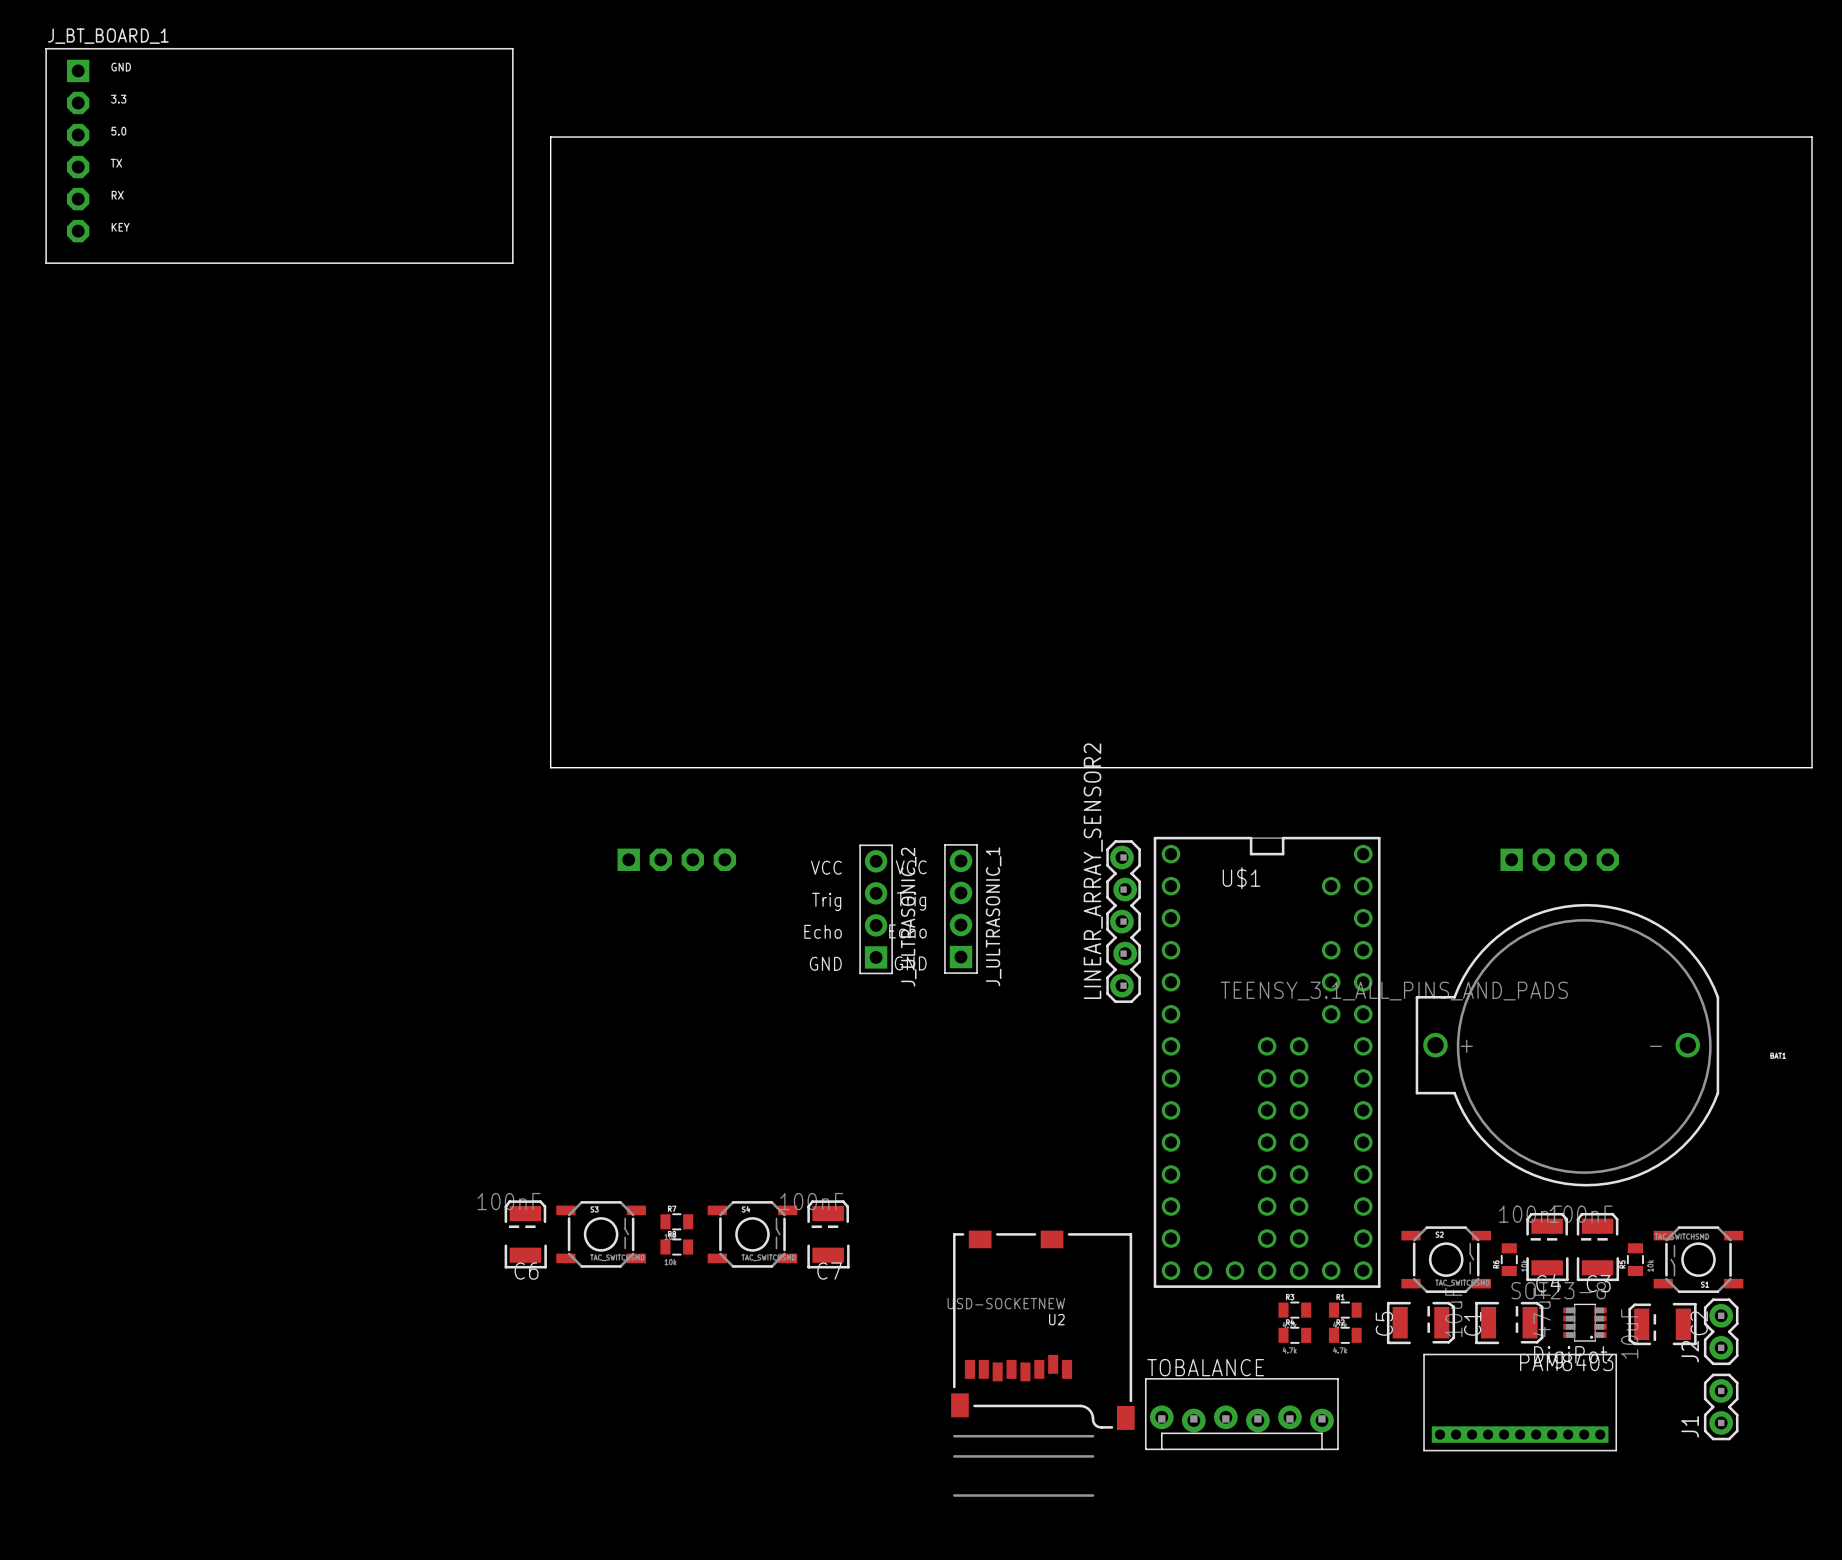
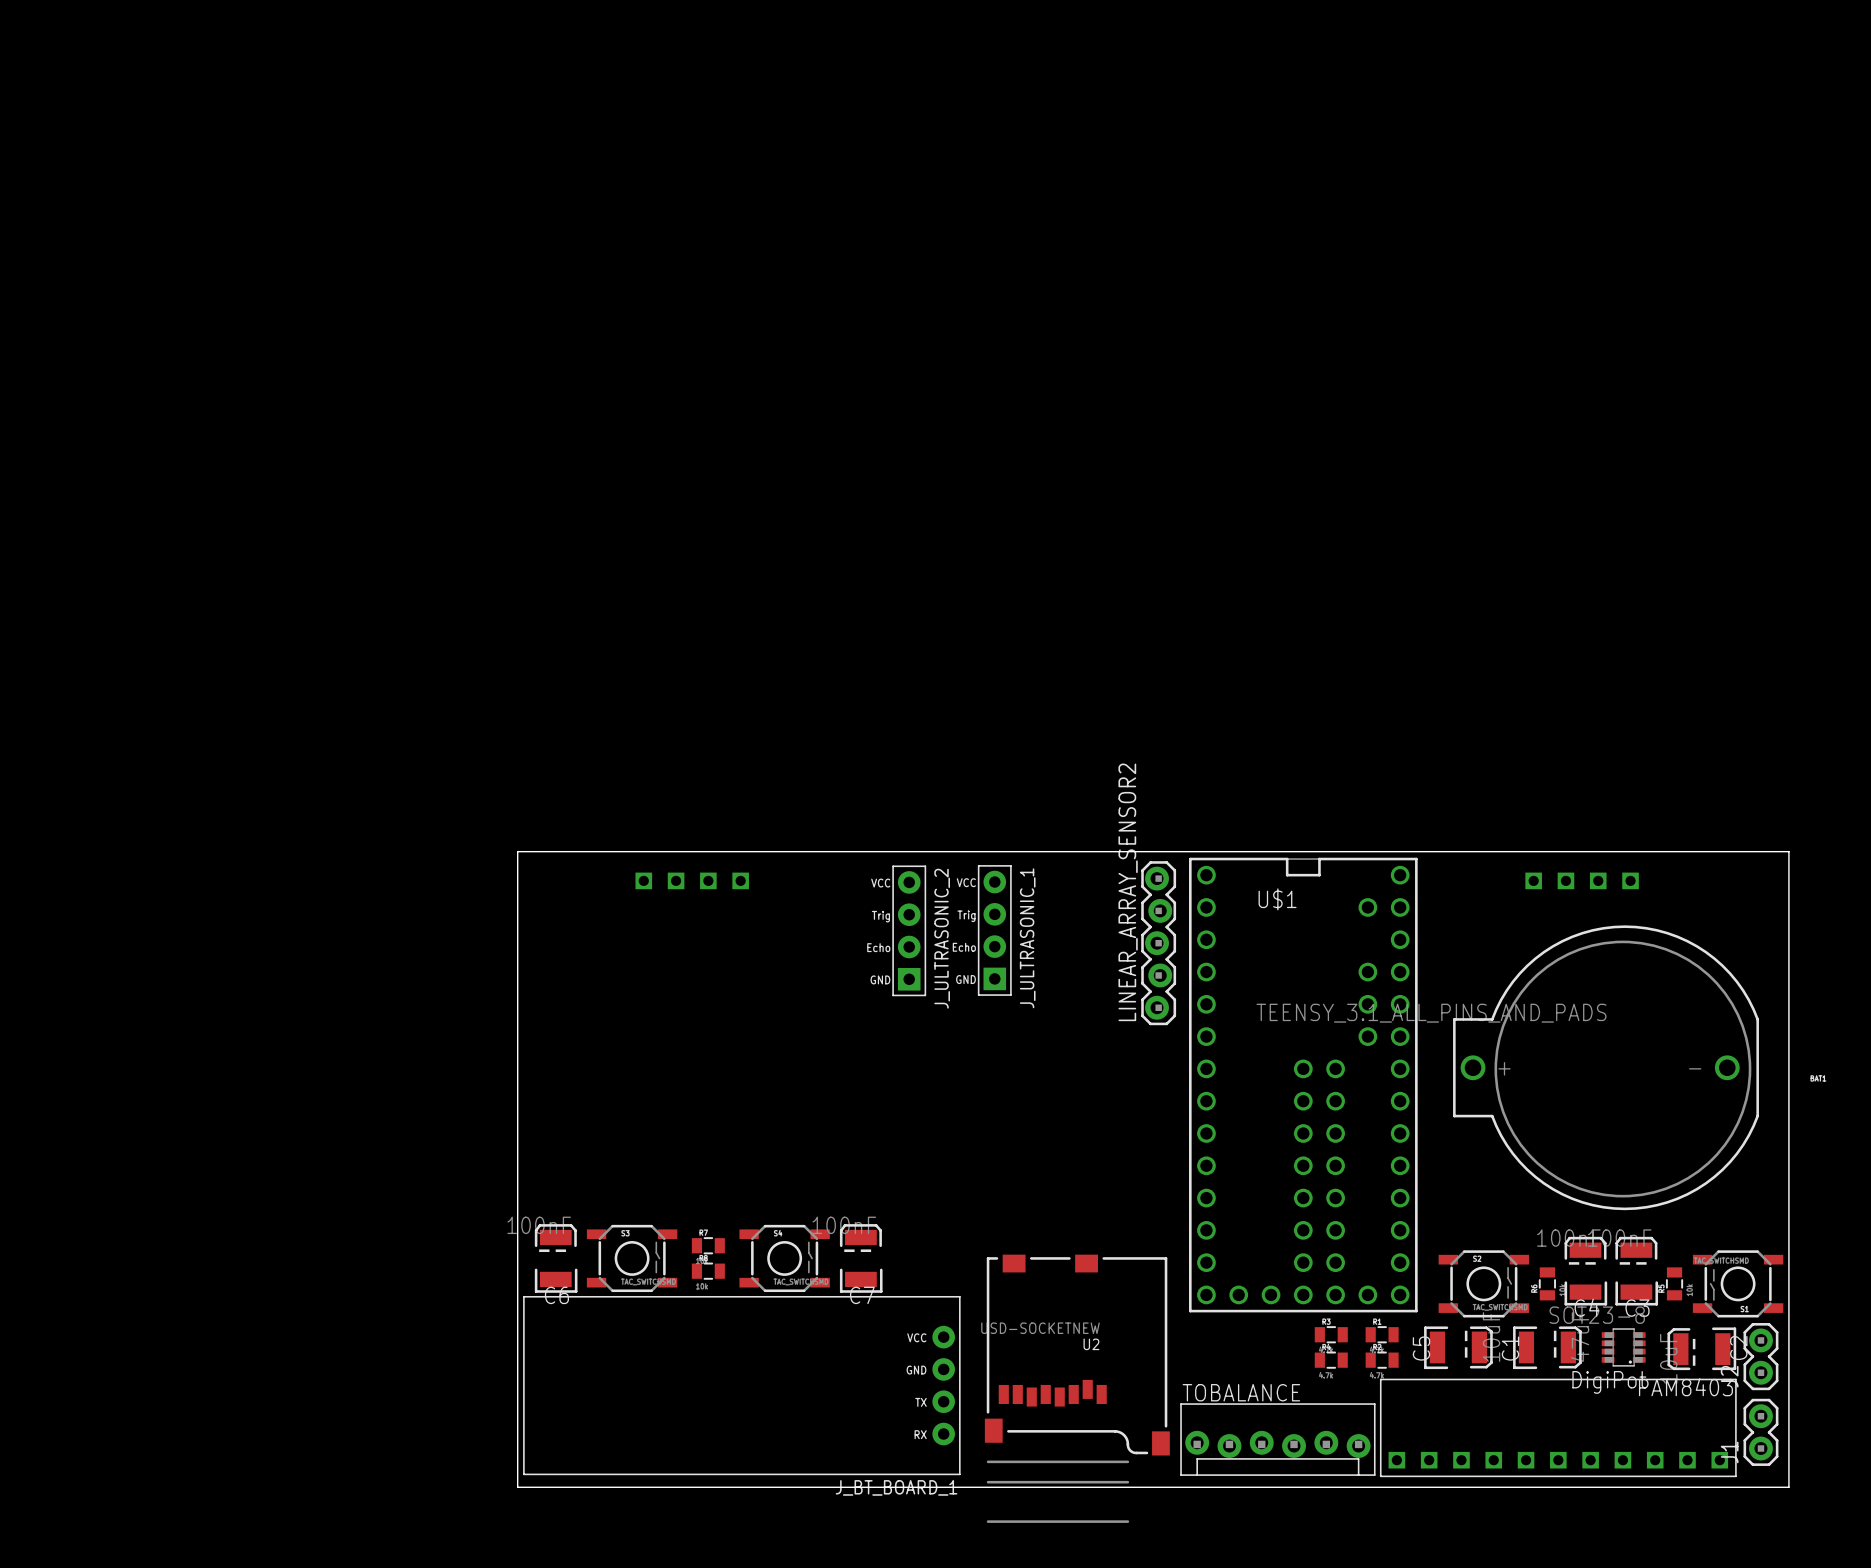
J_BT_BOARD_1 name position: J_BT_BOARD_1 (108, 36) -> J_BT_BOARD_1 (896, 1487)
J_BT_BOARD_1 footprint: [45, 47, 514, 264] -> [523, 1295, 961, 1476]
board edge: (550, 137) (1812, 137) (1812, 767) (550, 767) (550, 137) -> none
board edge: none -> (517, 851) (1788, 851) (1788, 1487) (517, 1487) (517, 851)
J_ULTRASONIC_2 footprint: [859, 844, 893, 975] -> [892, 865, 927, 997]
J_ULTRASONIC_1 footprint: [944, 844, 978, 974] -> [977, 865, 1012, 996]
part: none -> (692, 880)
part: (676, 859) -> none
part: none -> (1582, 880)
part: (1559, 859) -> none
part footprint: [1423, 1353, 1618, 1452] -> [1379, 1378, 1737, 1478]

